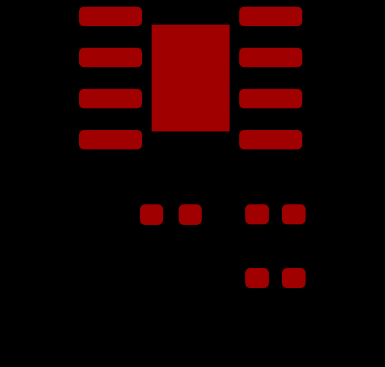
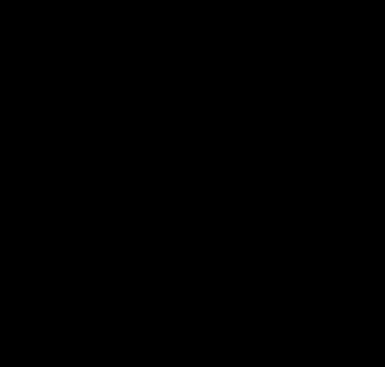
part: (190, 78) -> none
part: (170, 214) -> none
part: (275, 214) -> none
part: (275, 278) -> none

